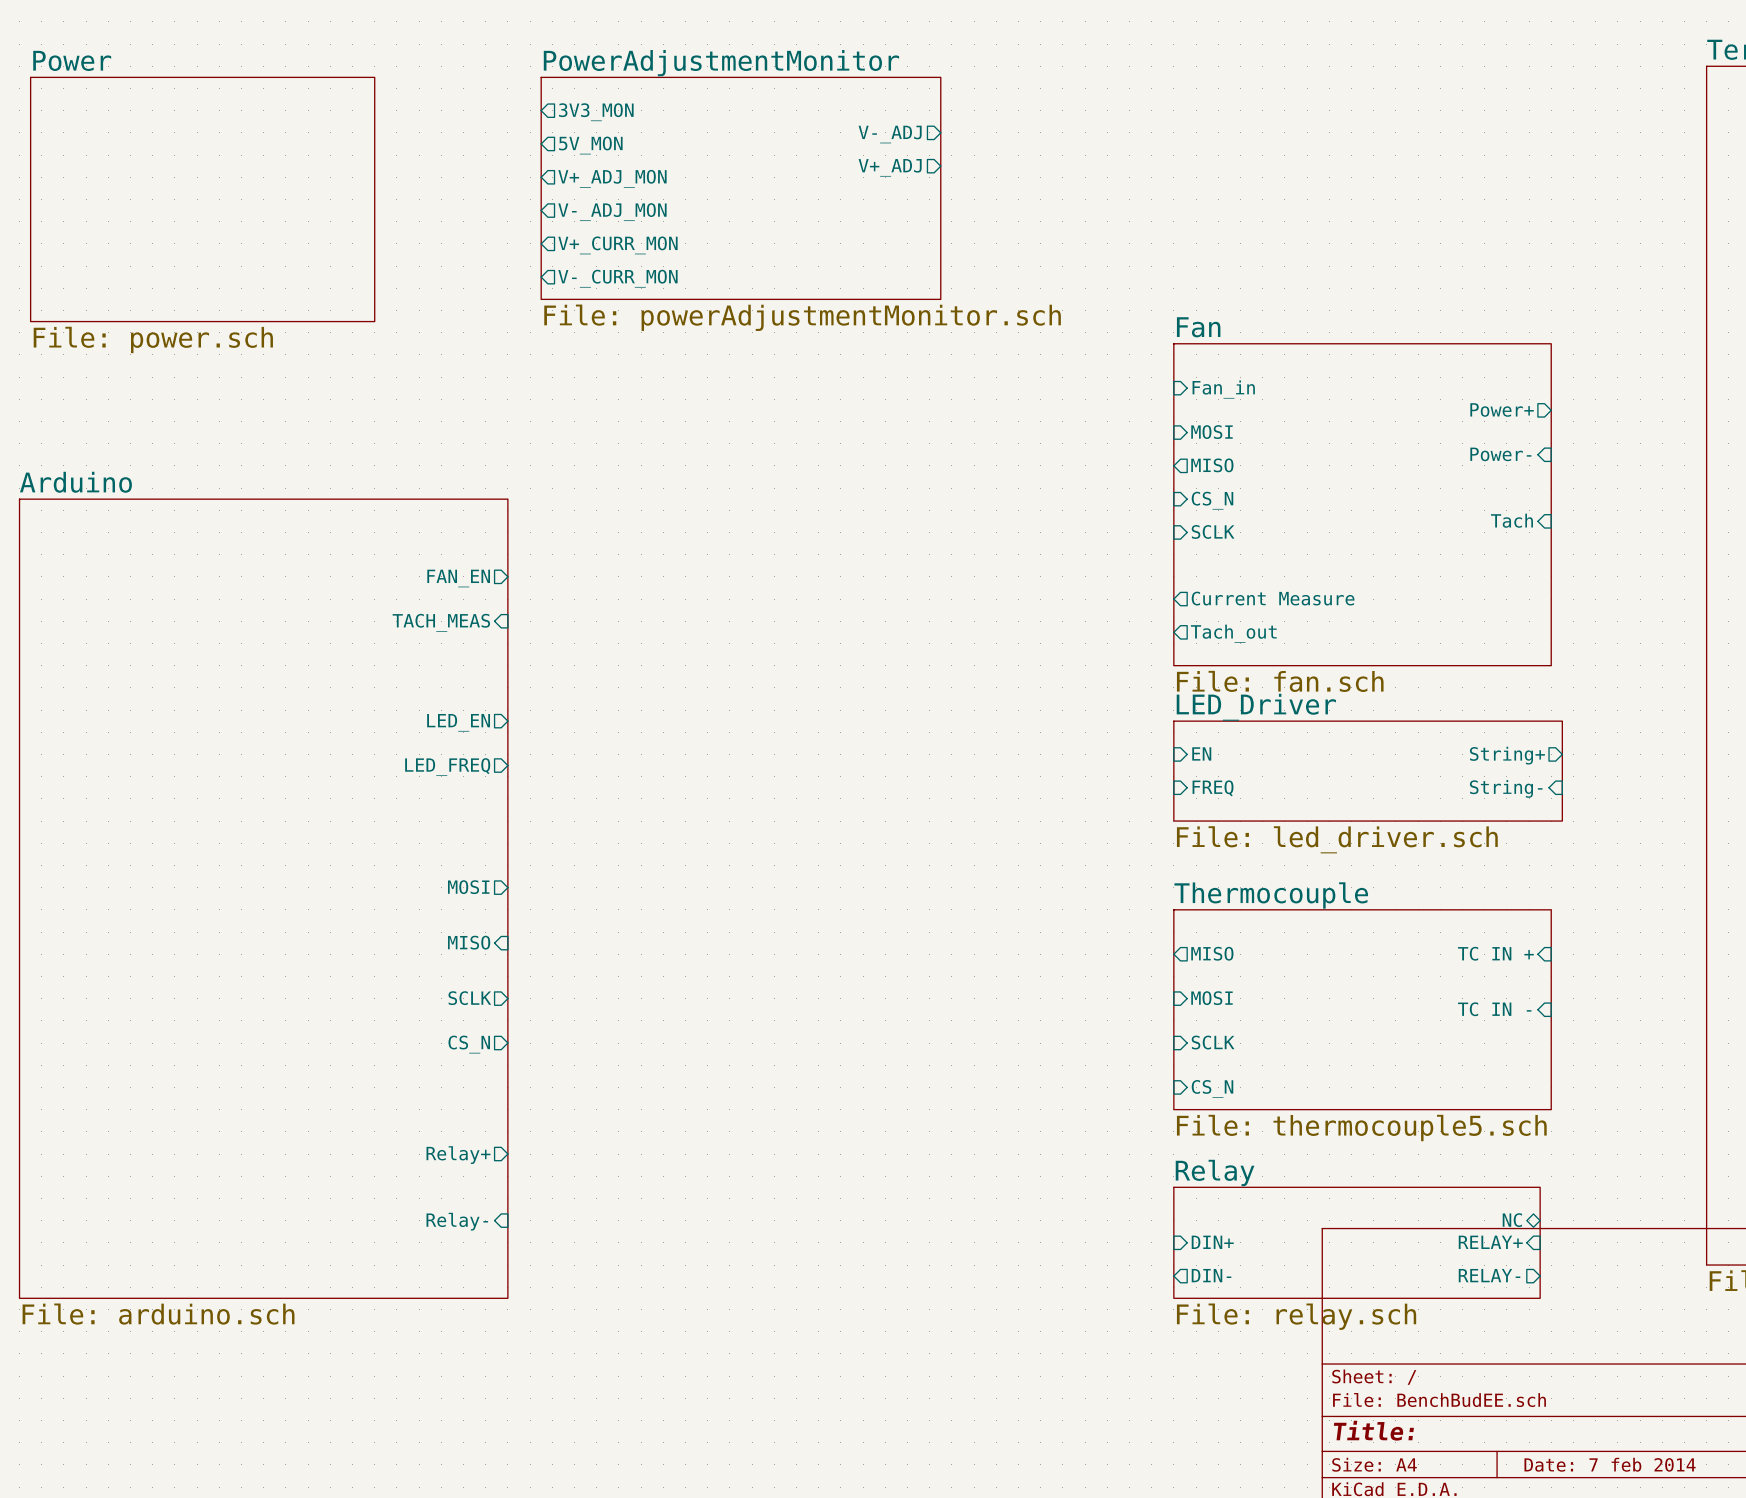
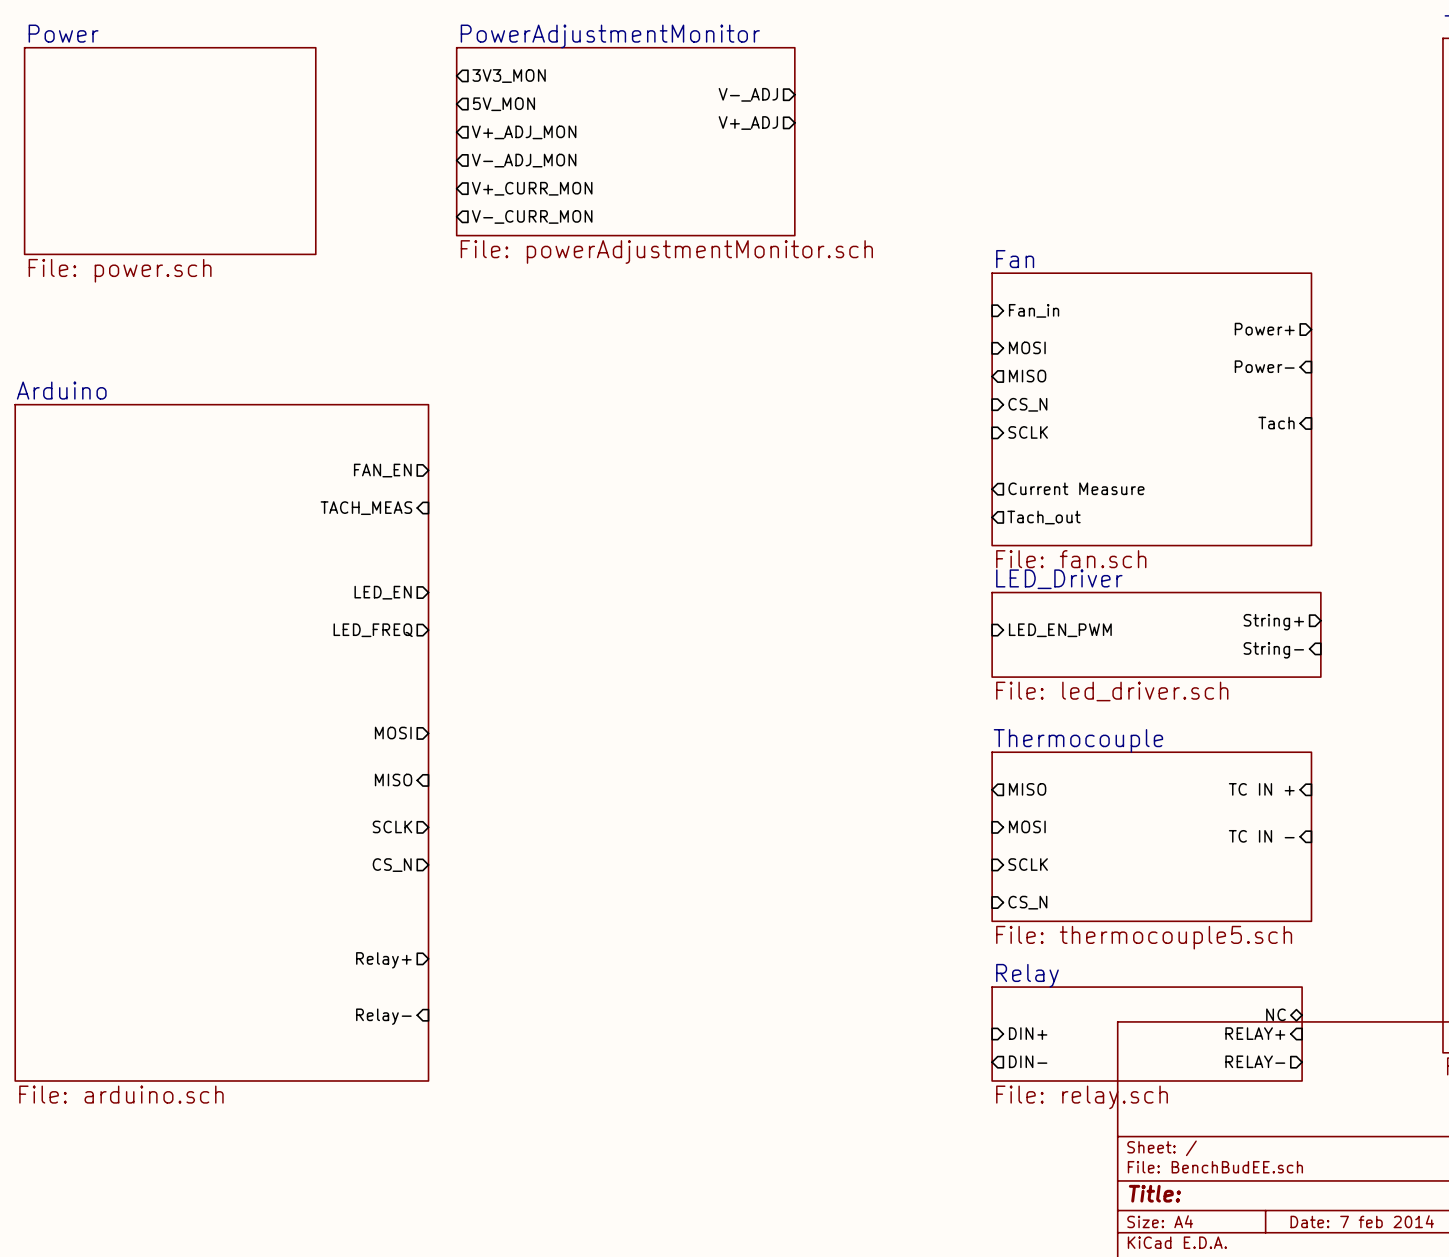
sheet pin: EN (1201, 753) -> none
sheet pin: none -> LED_EN_PWM (1060, 630)
sheet pin: FREQ (1213, 788) -> none

